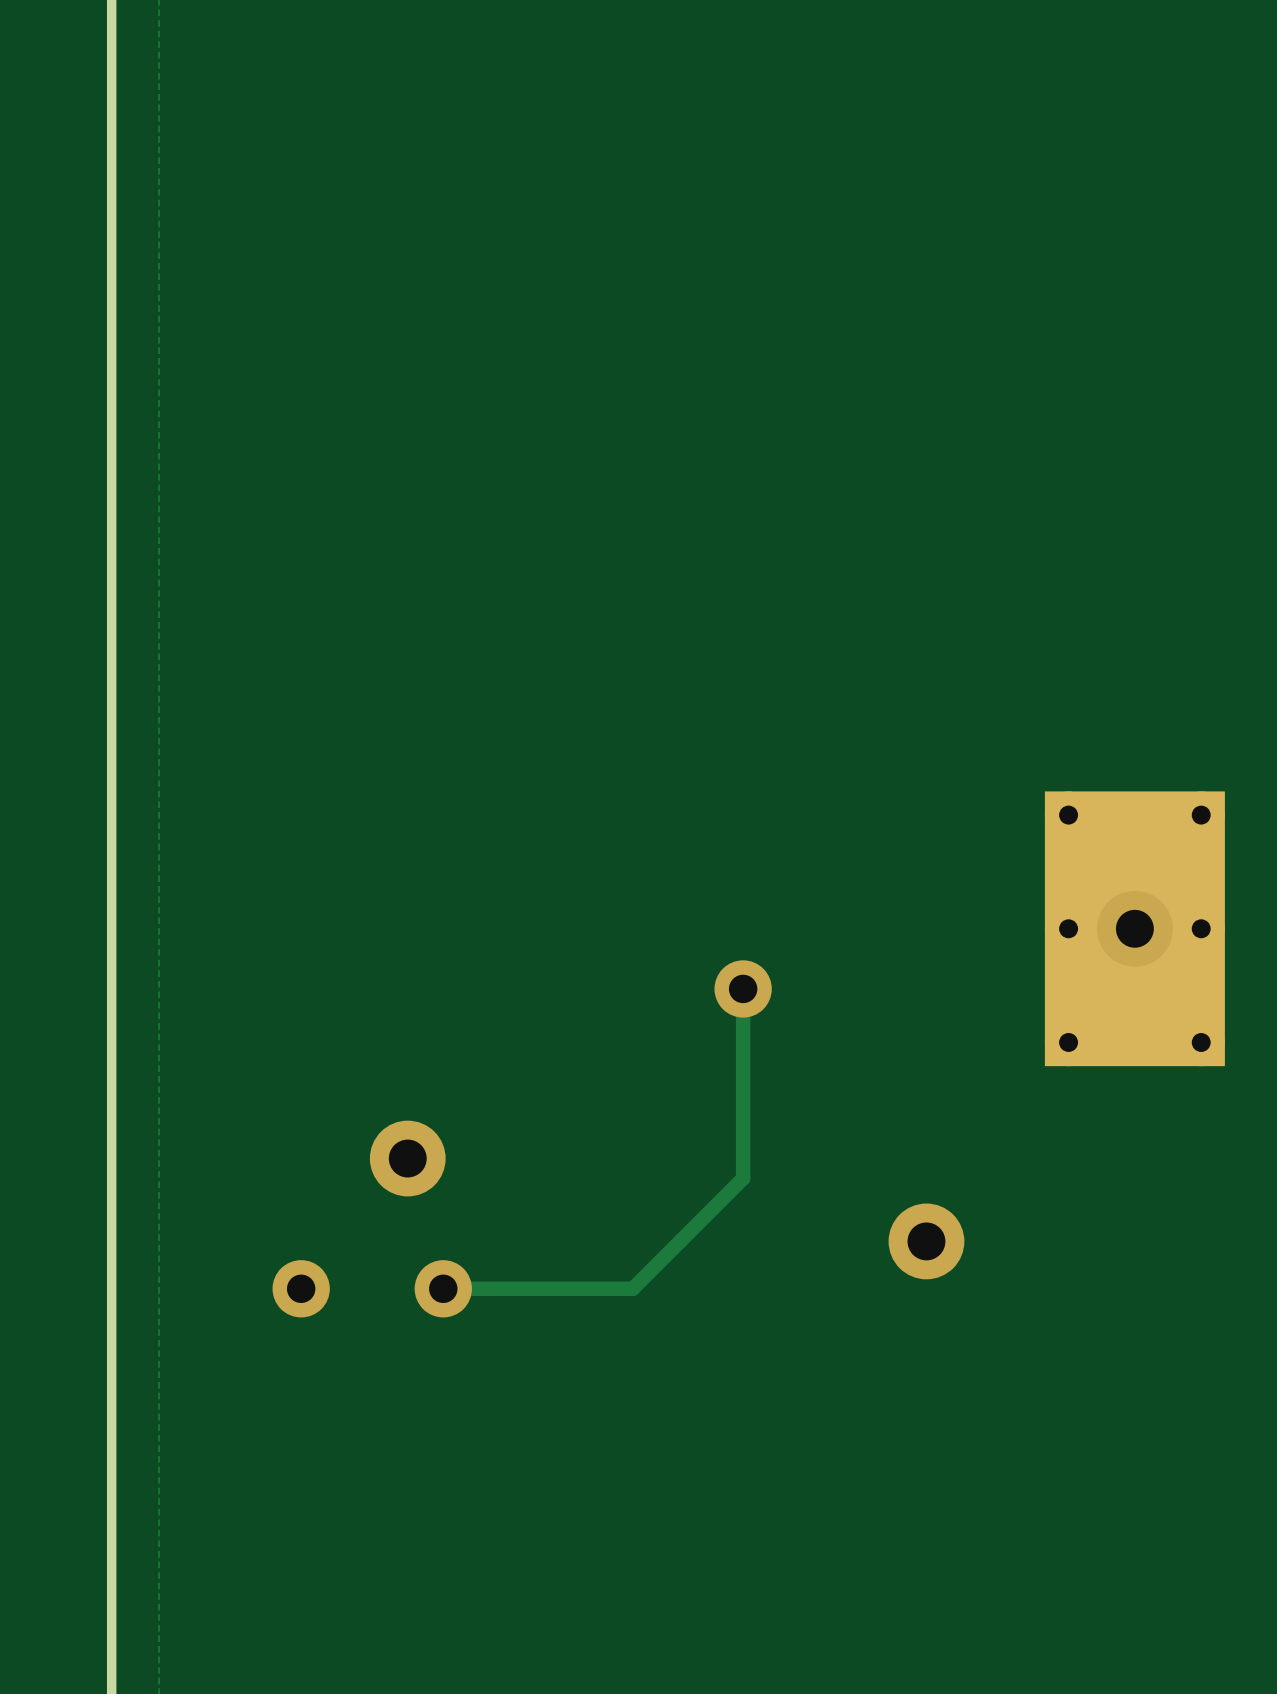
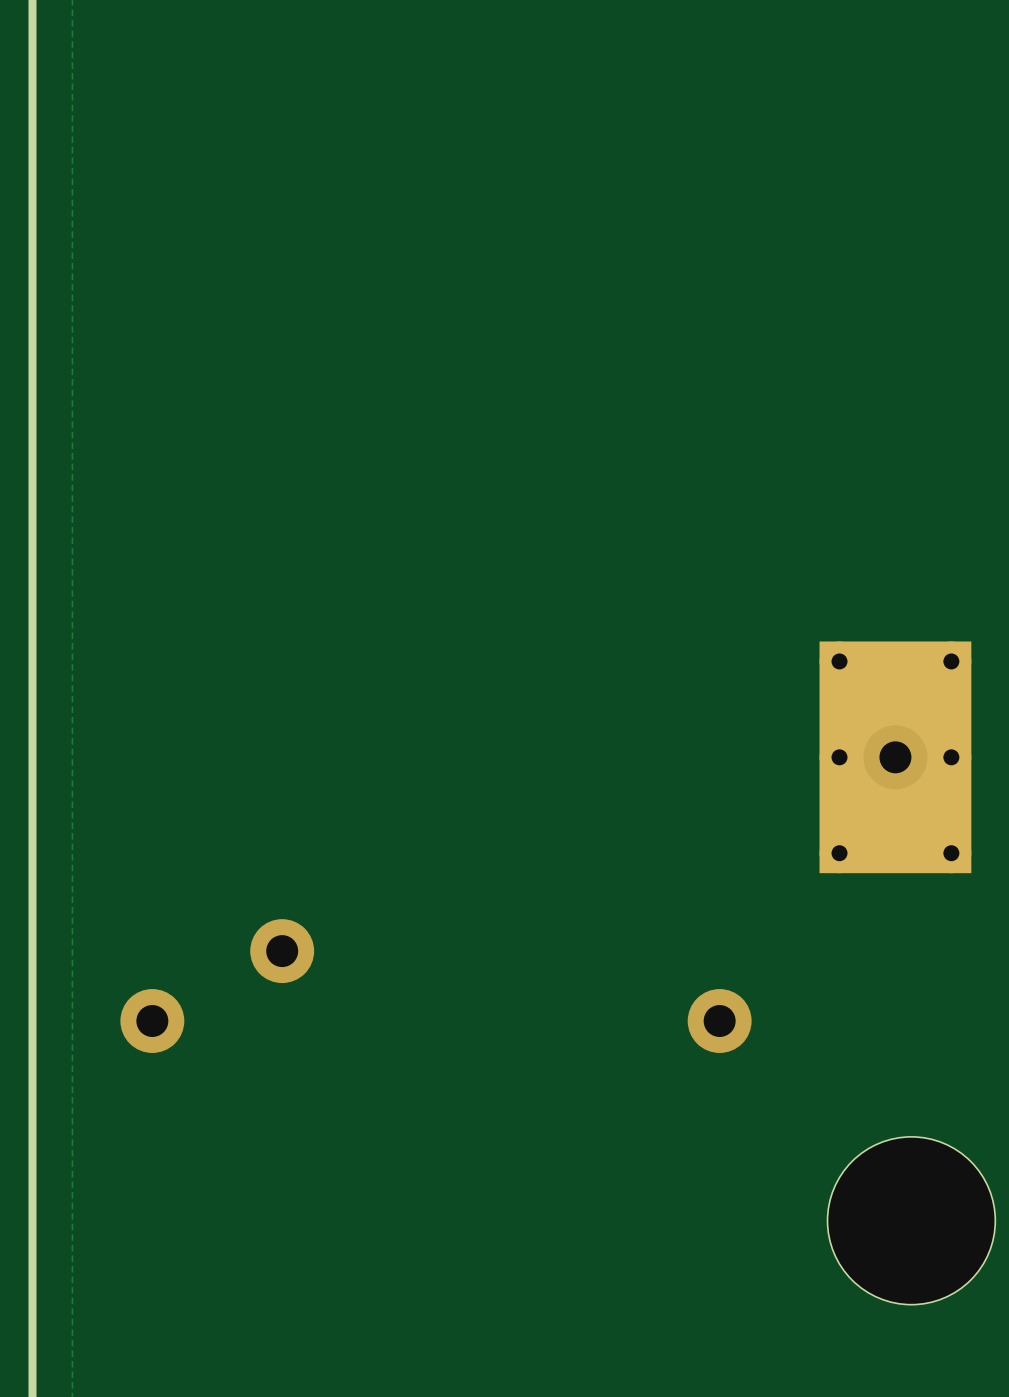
track: (743, 988) (743, 1178) (632, 1288) (443, 1288) -> none
via: (743, 988) -> none
via position: (301, 1288) -> (152, 1021)
via: (443, 1288) -> none
part: none -> (911, 1220)

